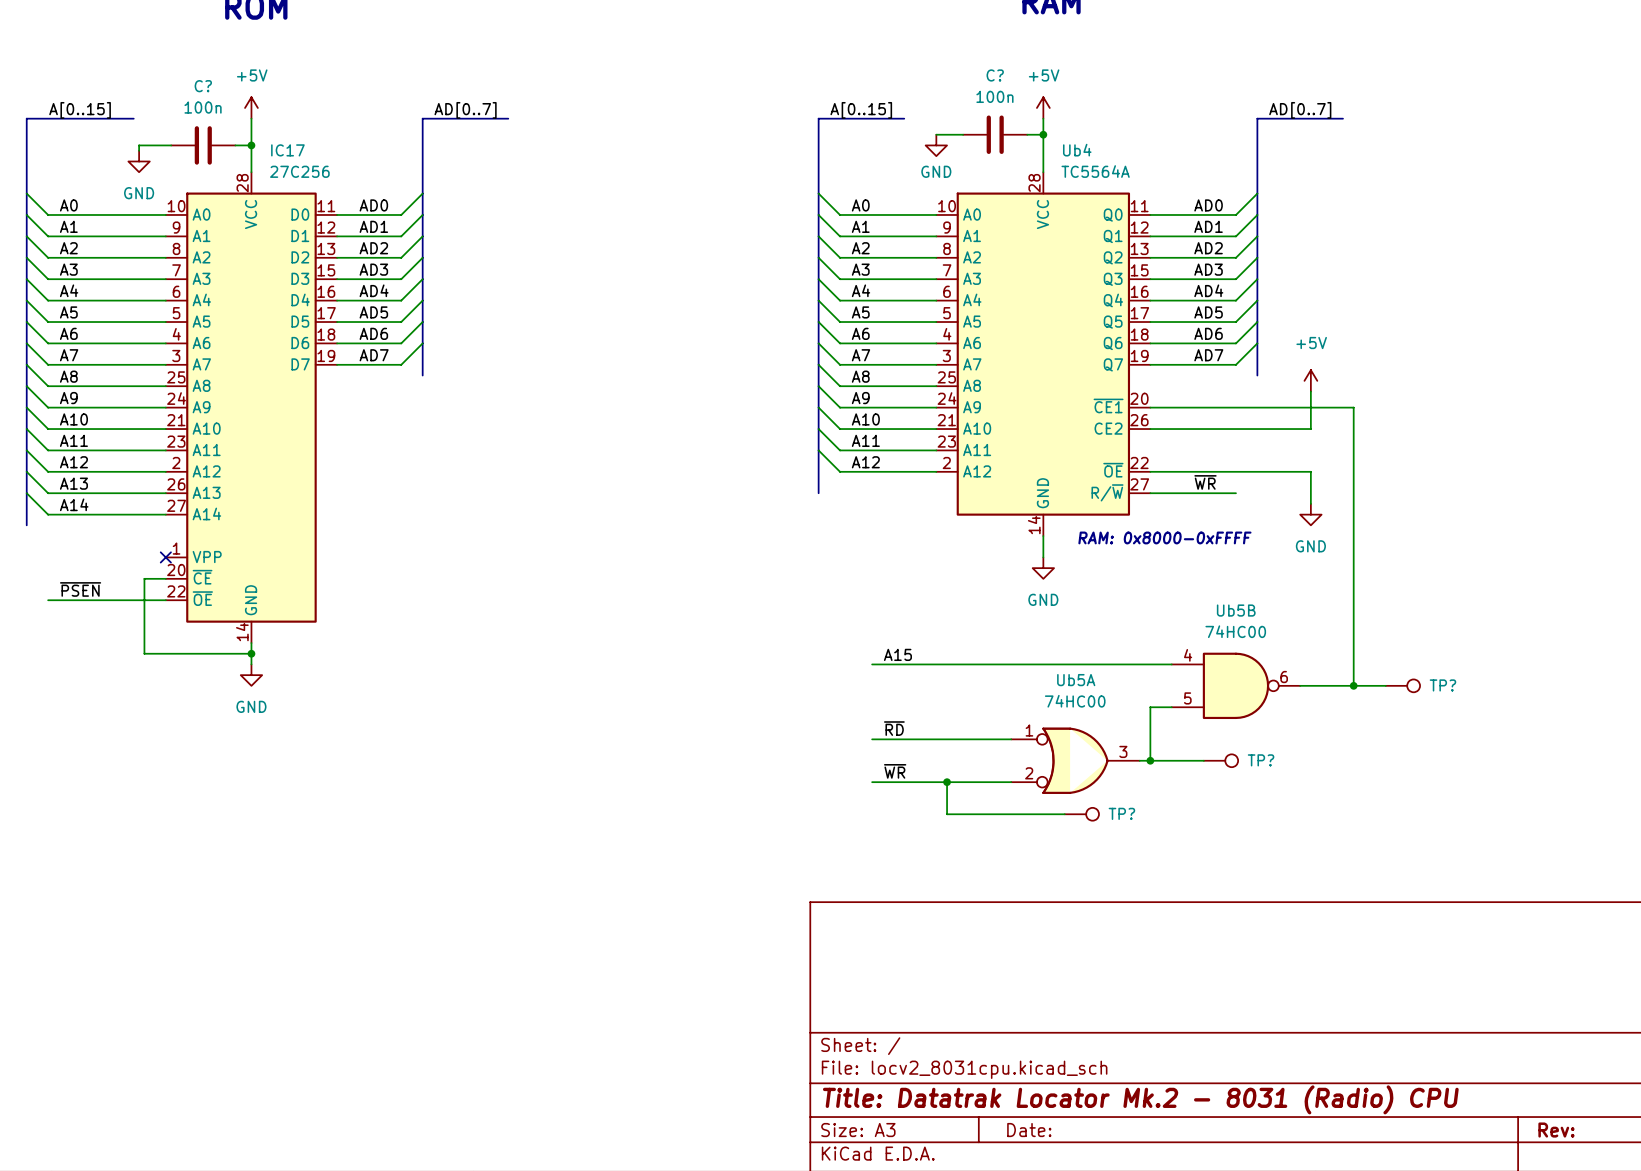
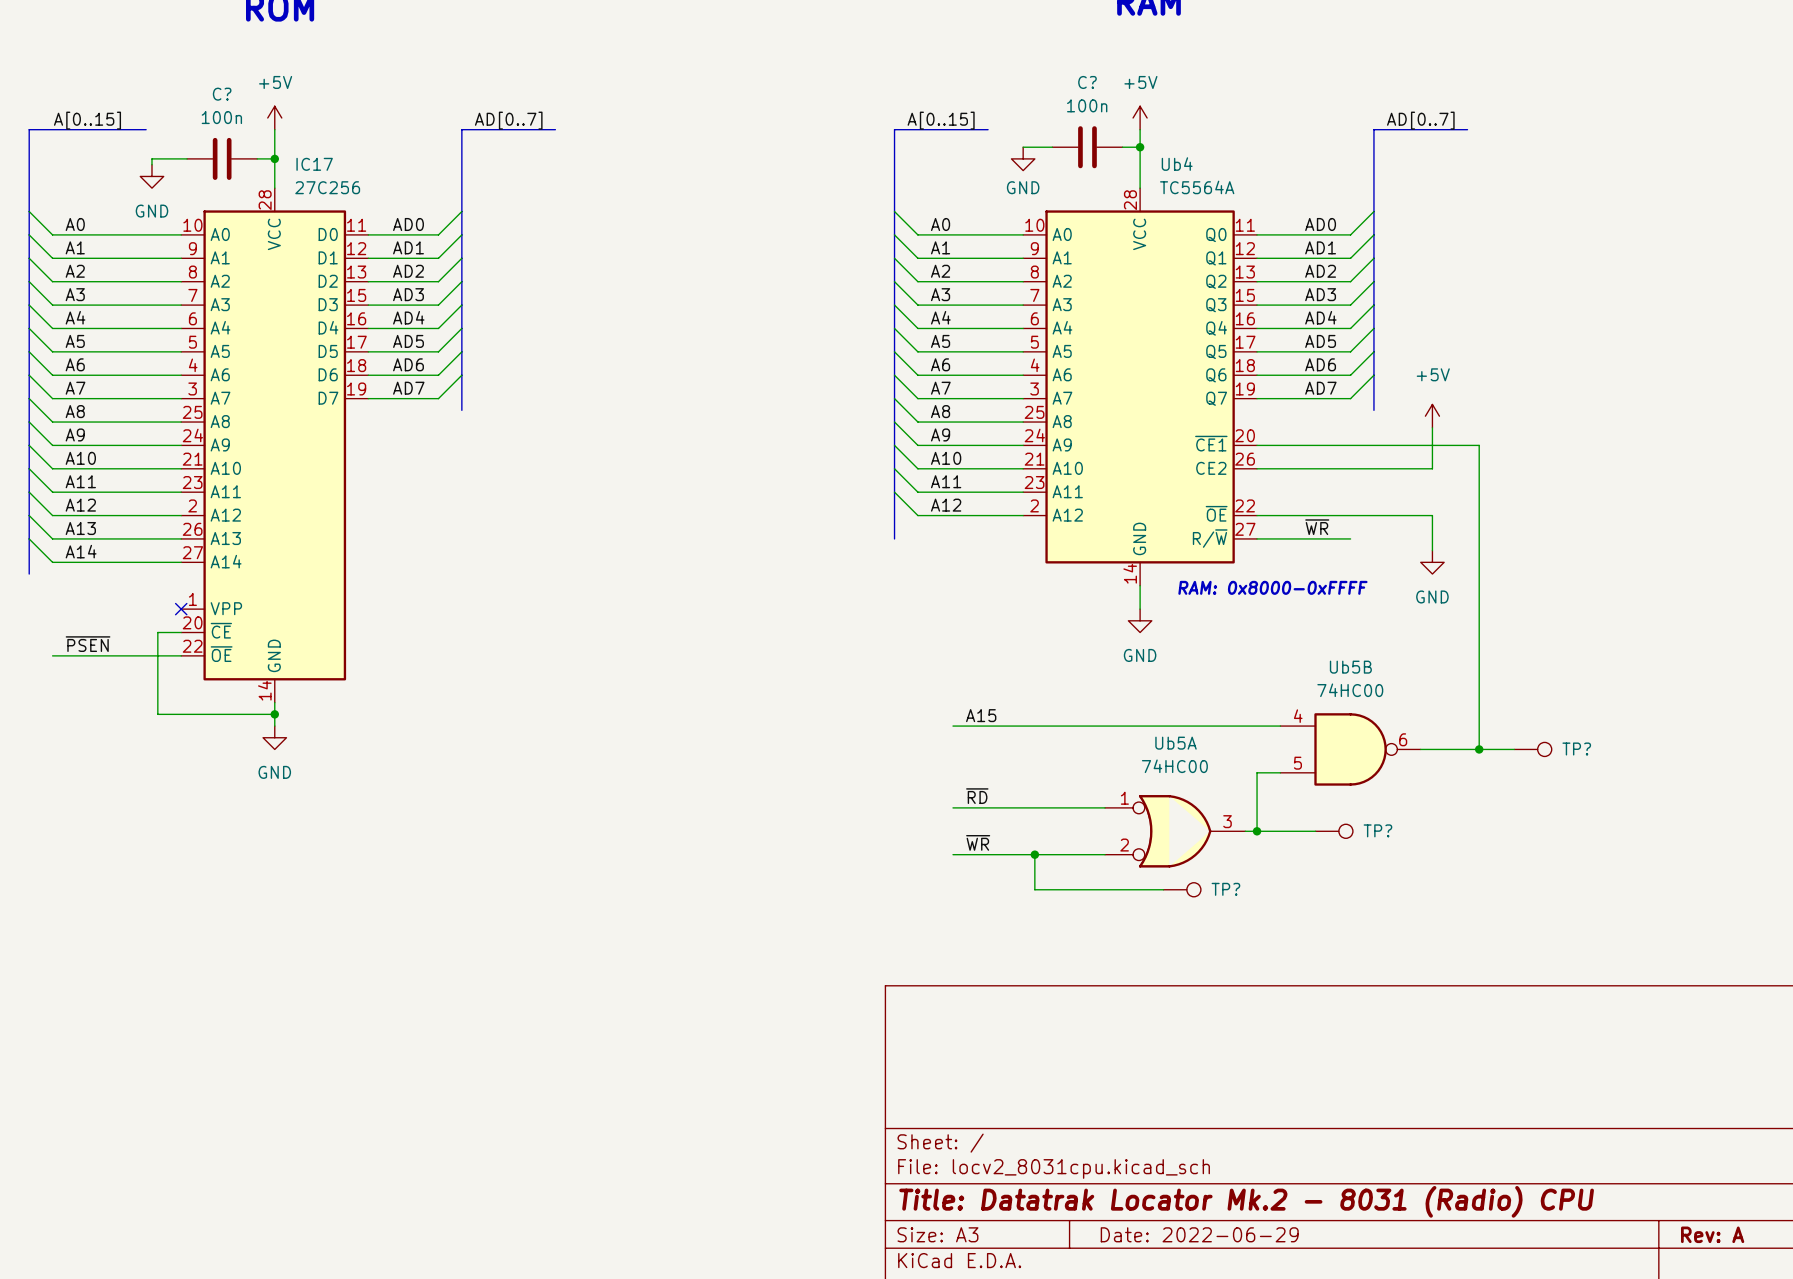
title block: Date: (1029, 1130) -> Date: 2022-06-29 (1199, 1234)
title block: Rev: (1556, 1130) -> Rev: A (1712, 1234)

